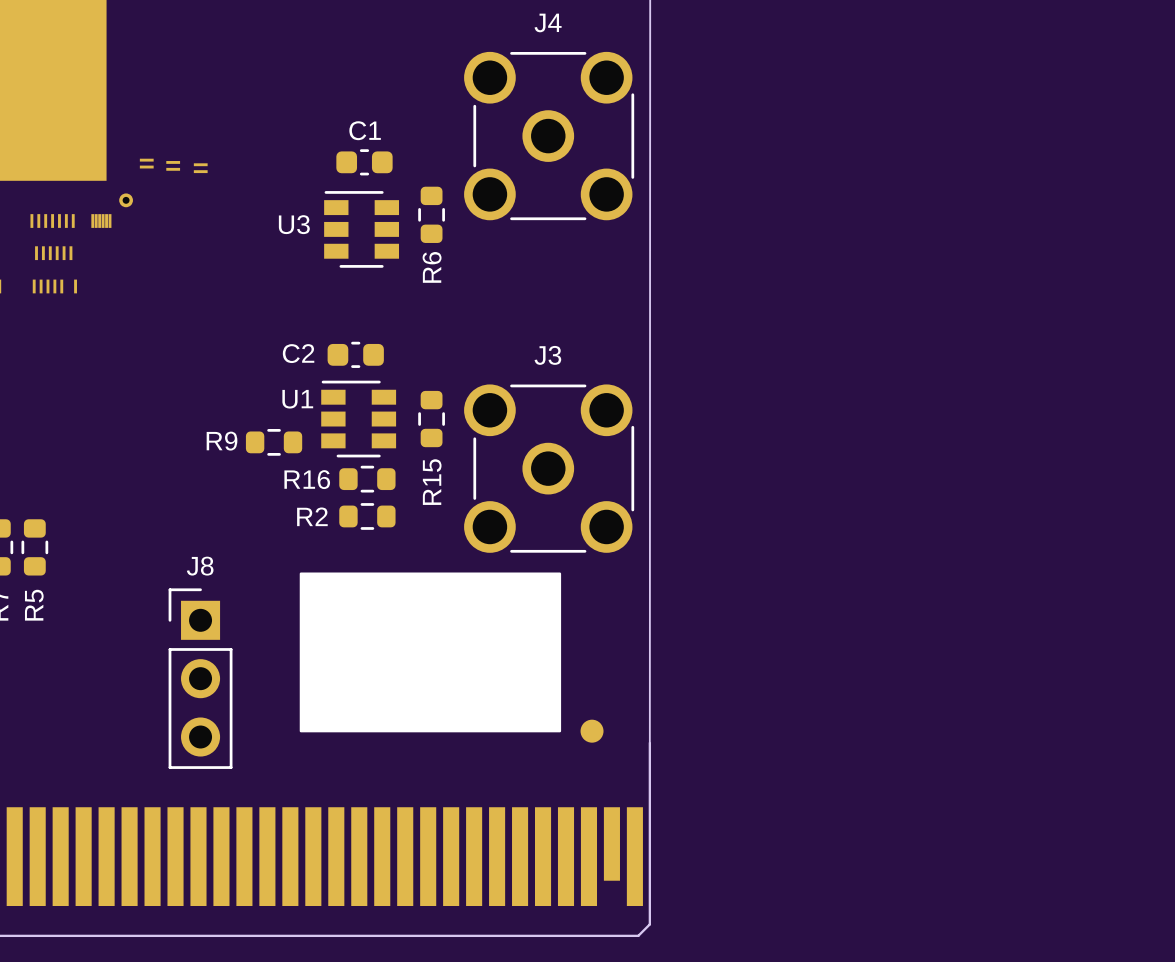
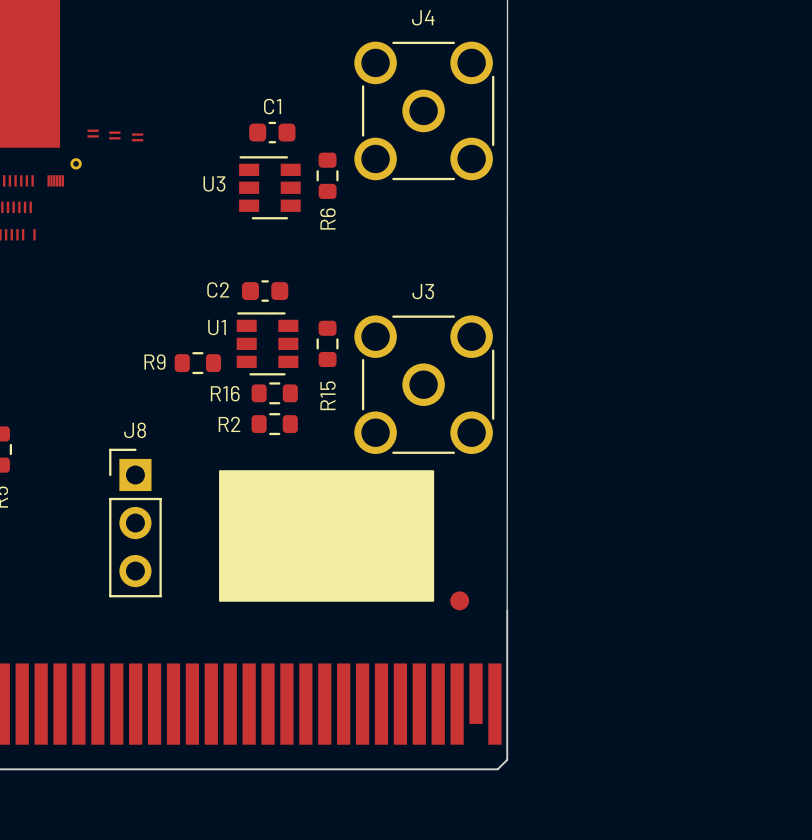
J8 position: (200, 678) -> (135, 523)

